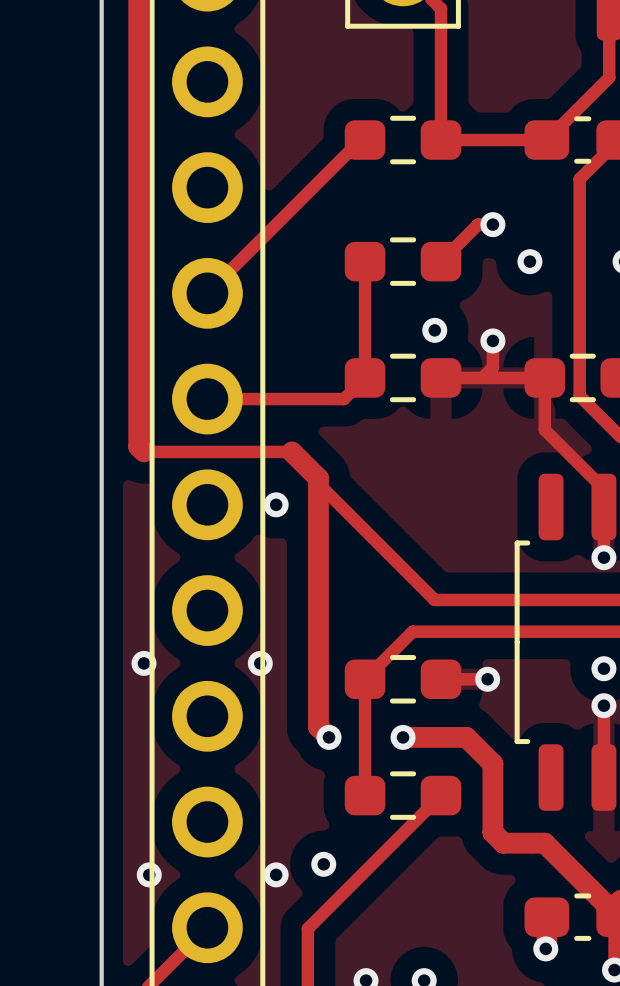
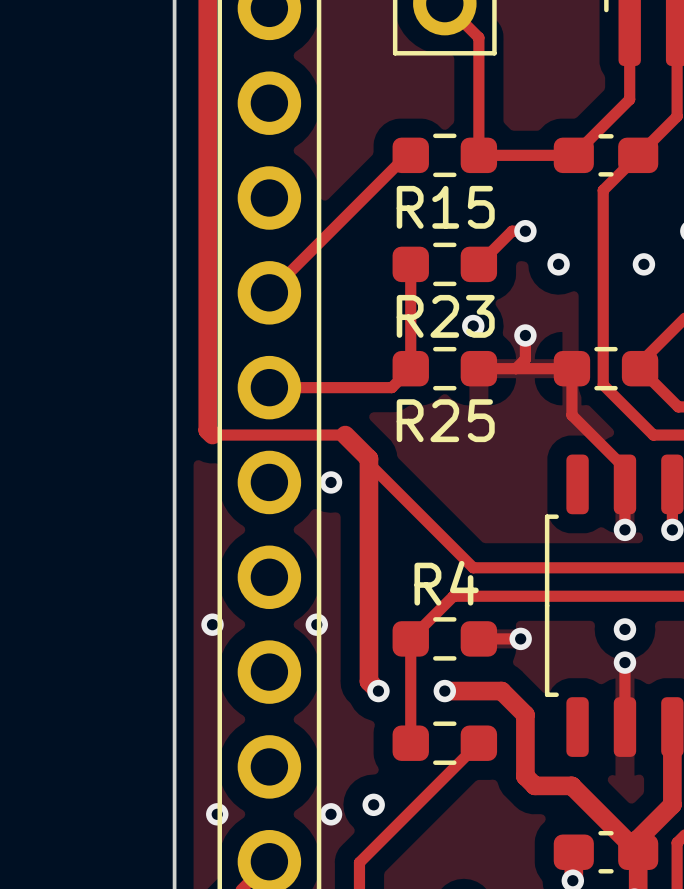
R15 name: none -> R15 (445, 207)
R23 name: none -> R23 (445, 316)
R25 name: none -> R25 (445, 420)
R4 name: none -> R4 (446, 583)

